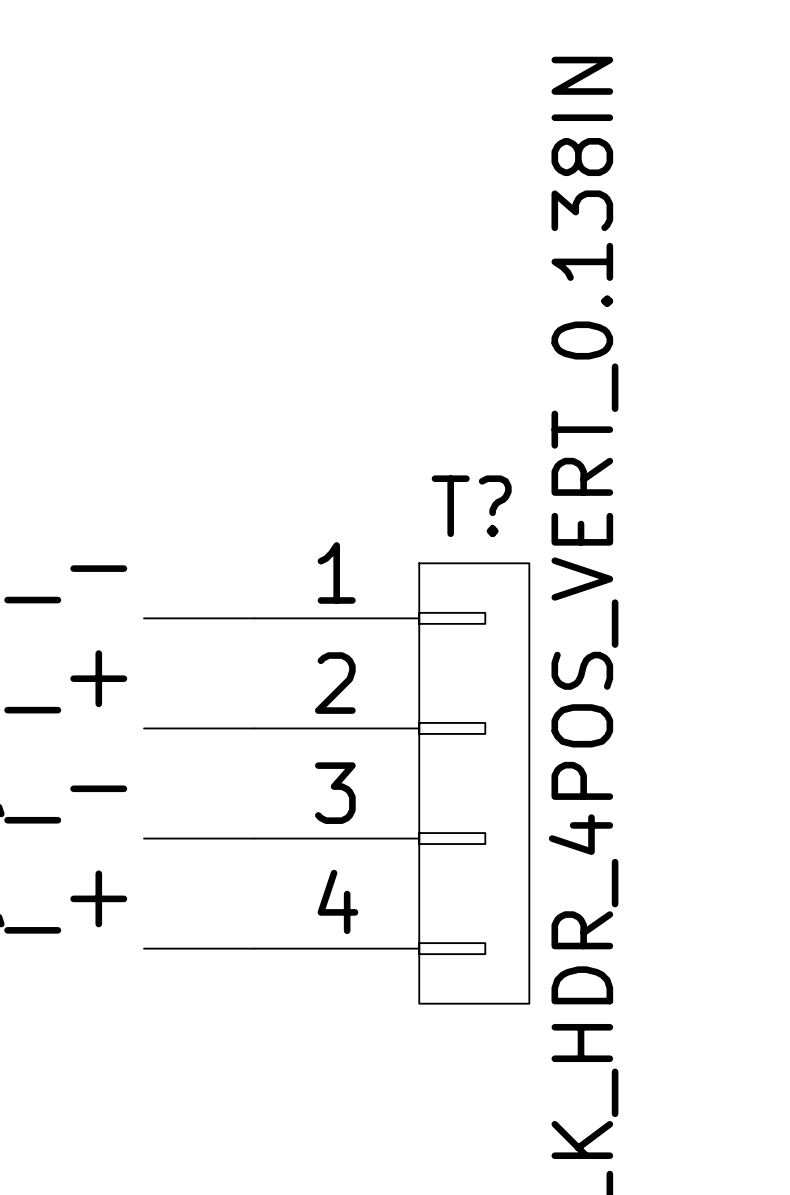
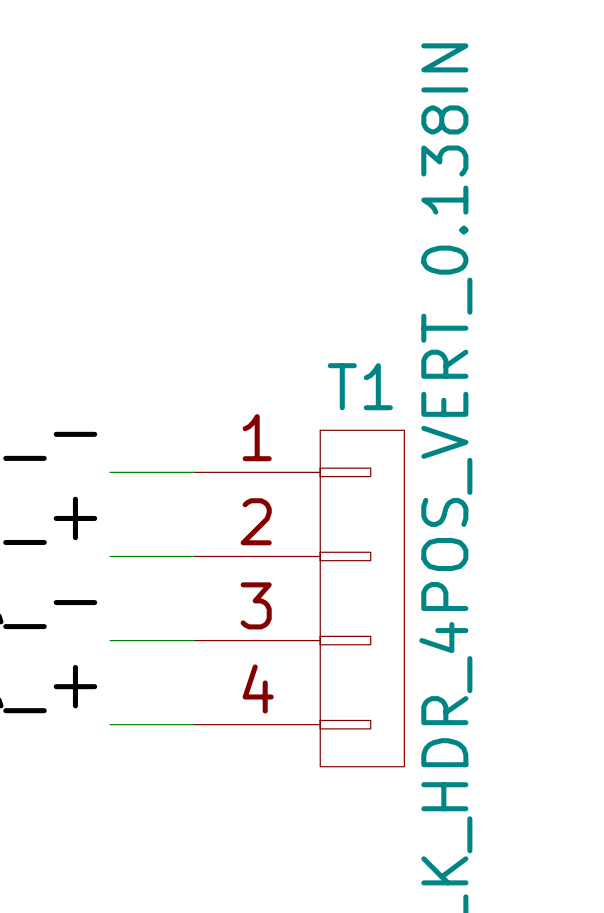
T? name: T? (471, 506) -> T1 (360, 386)

